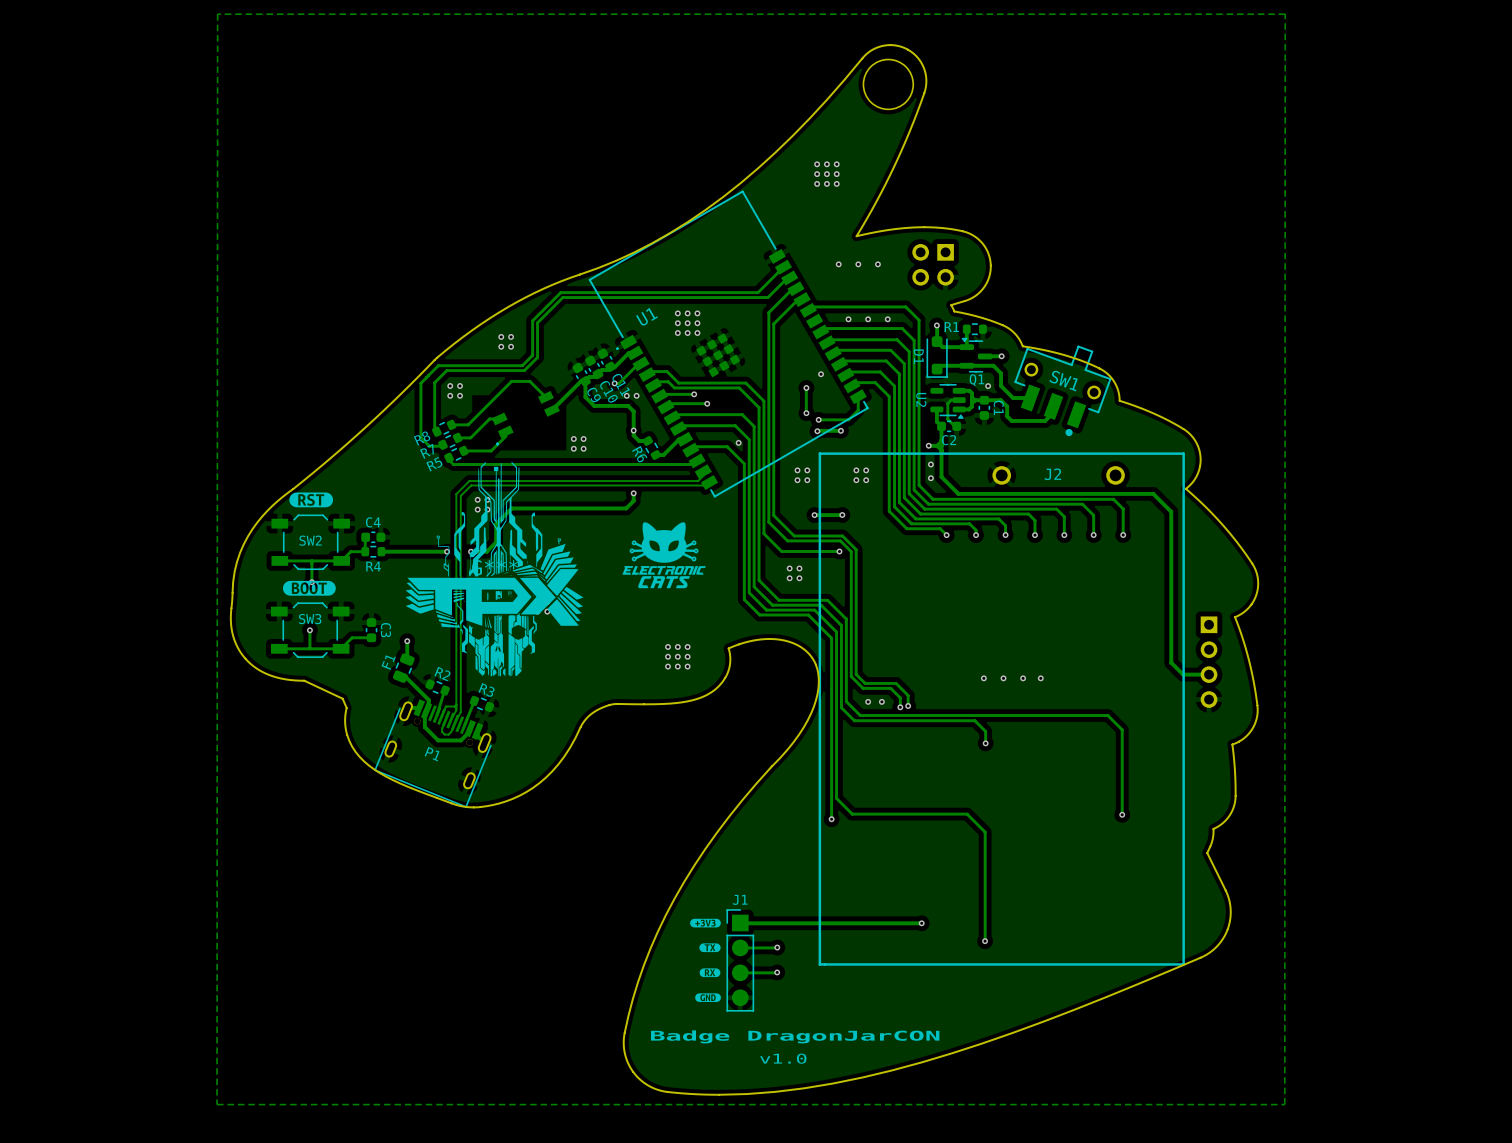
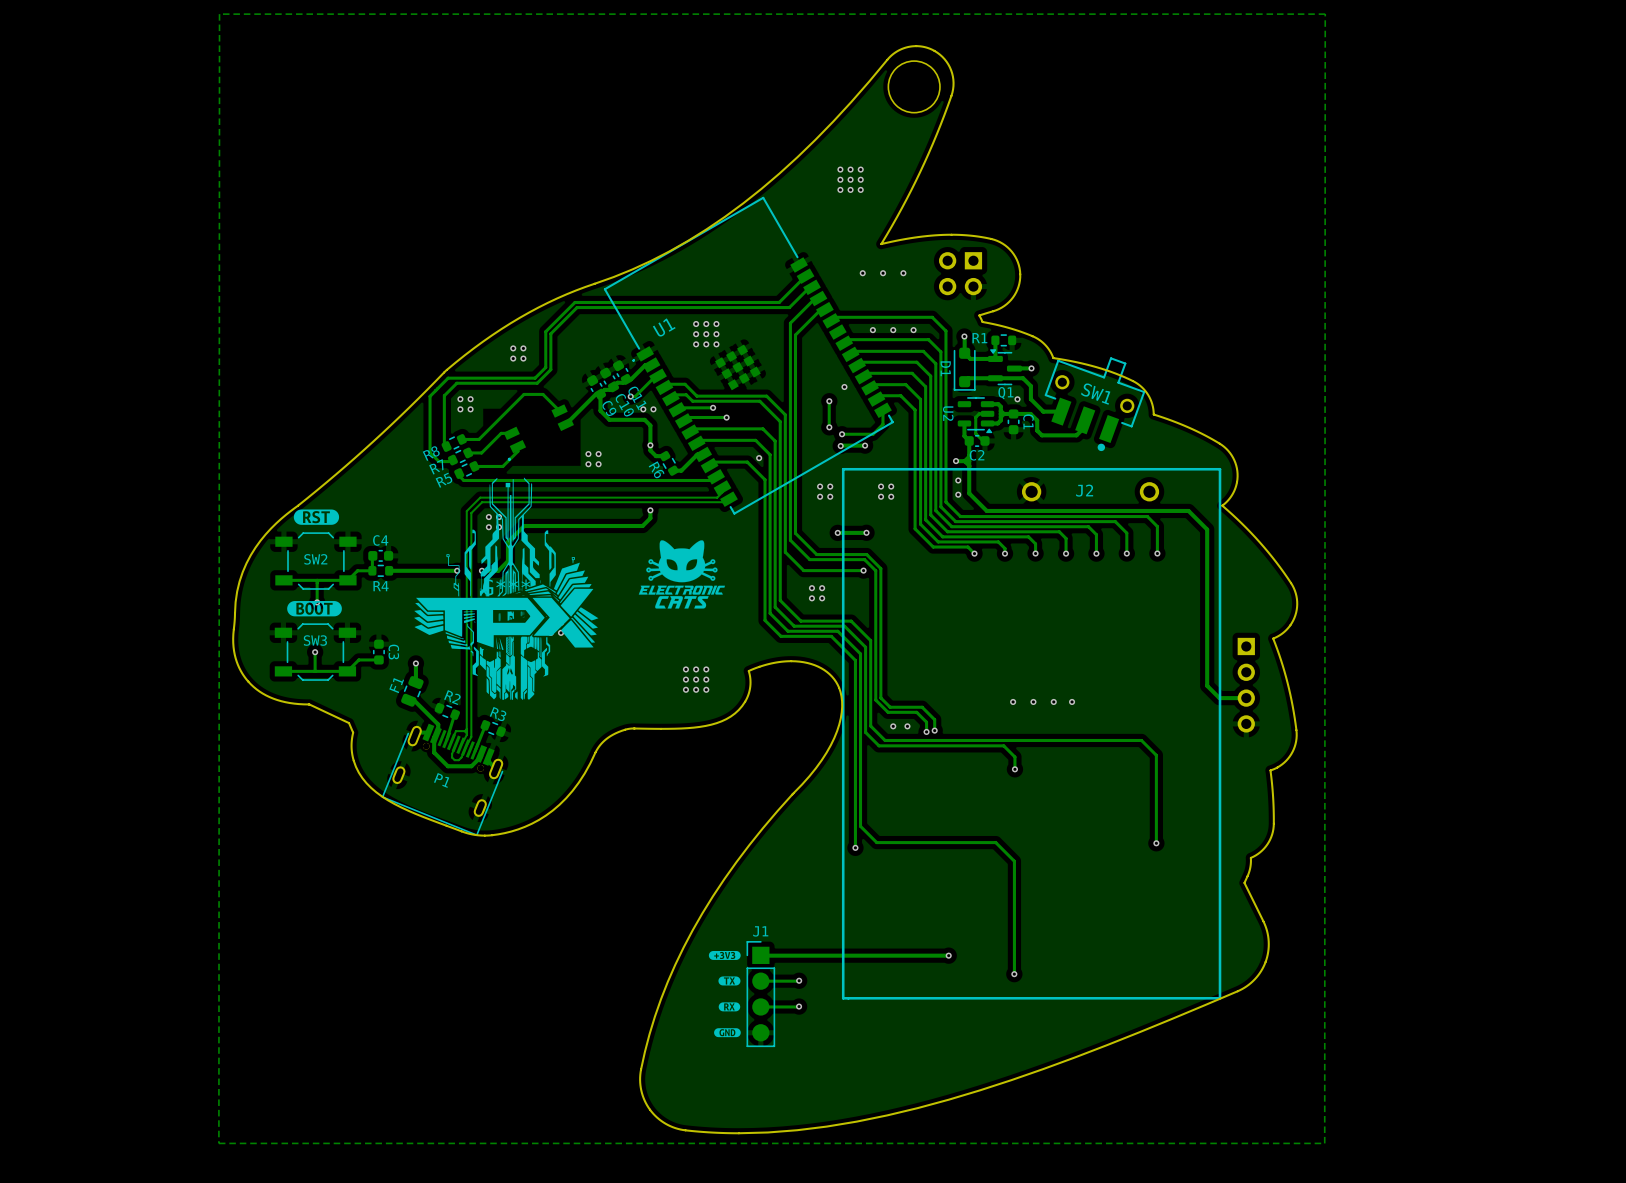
text: Badge DragonJarCON (795, 1036) -> none
text: v1.0 (783, 1058) -> none

